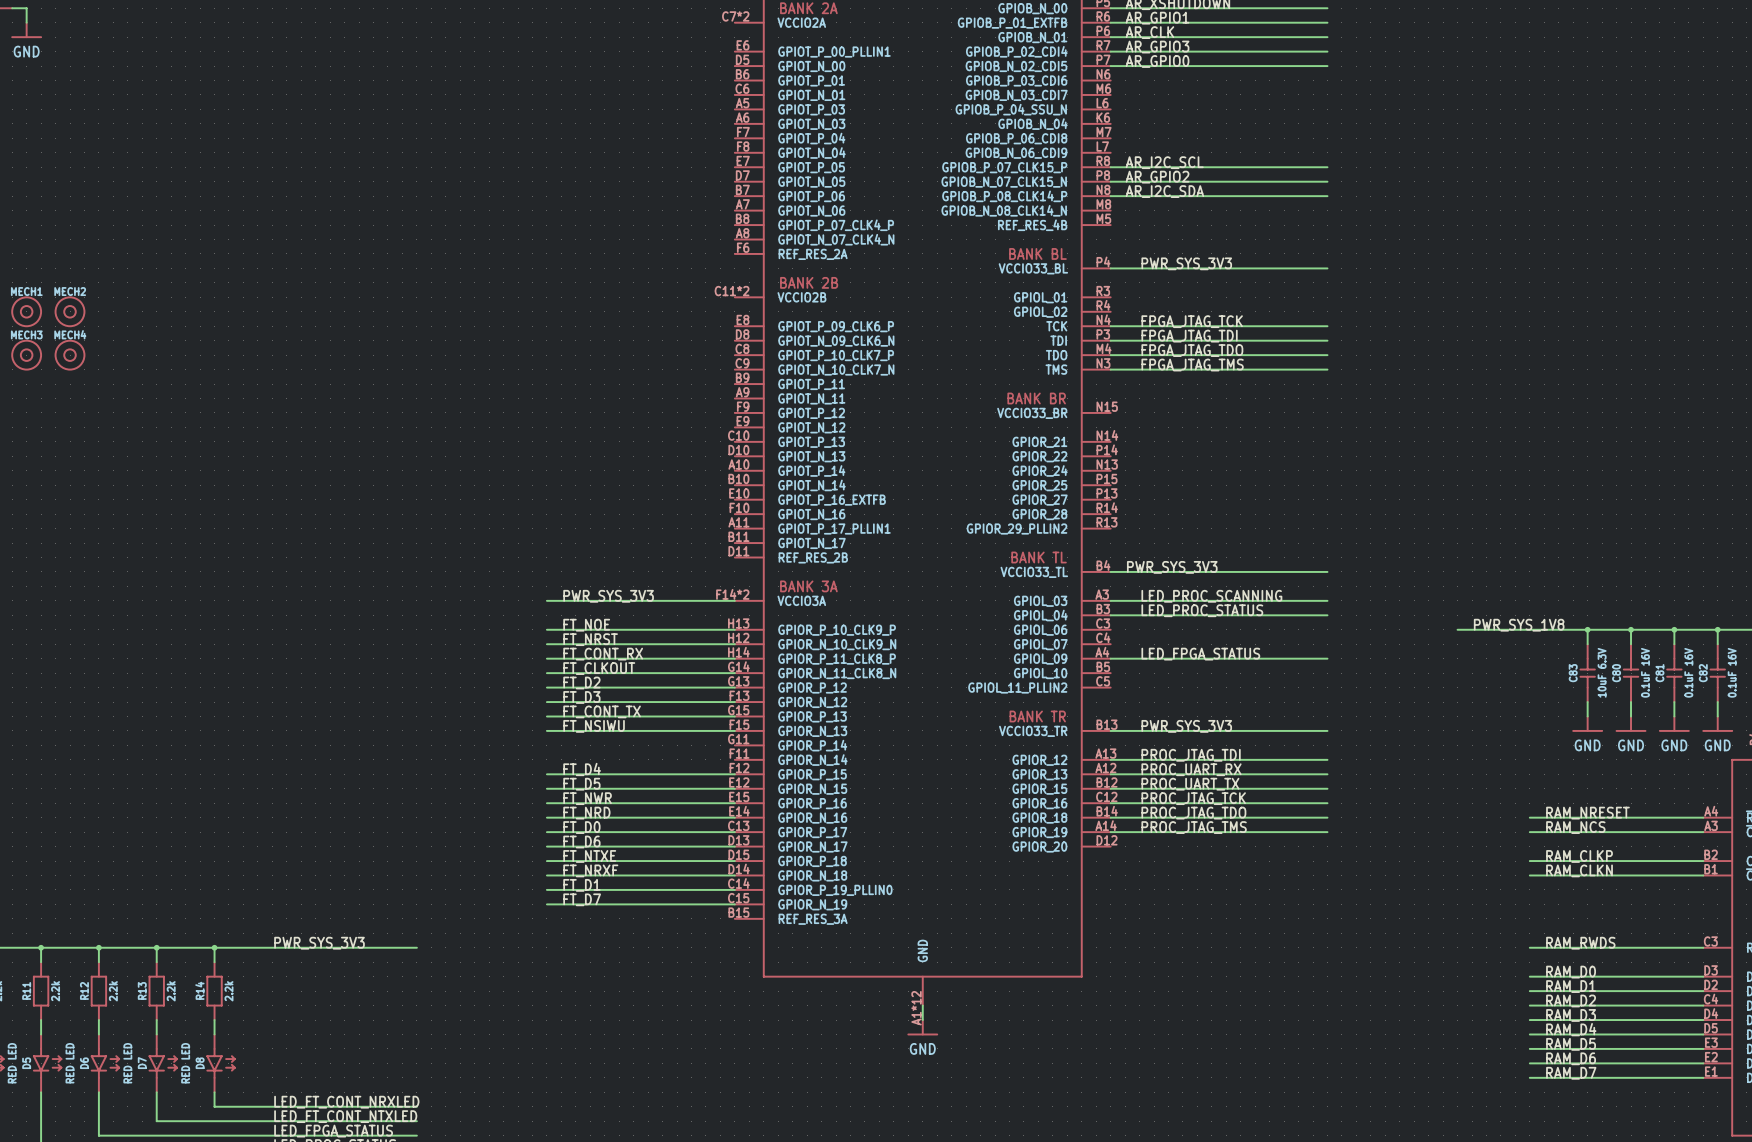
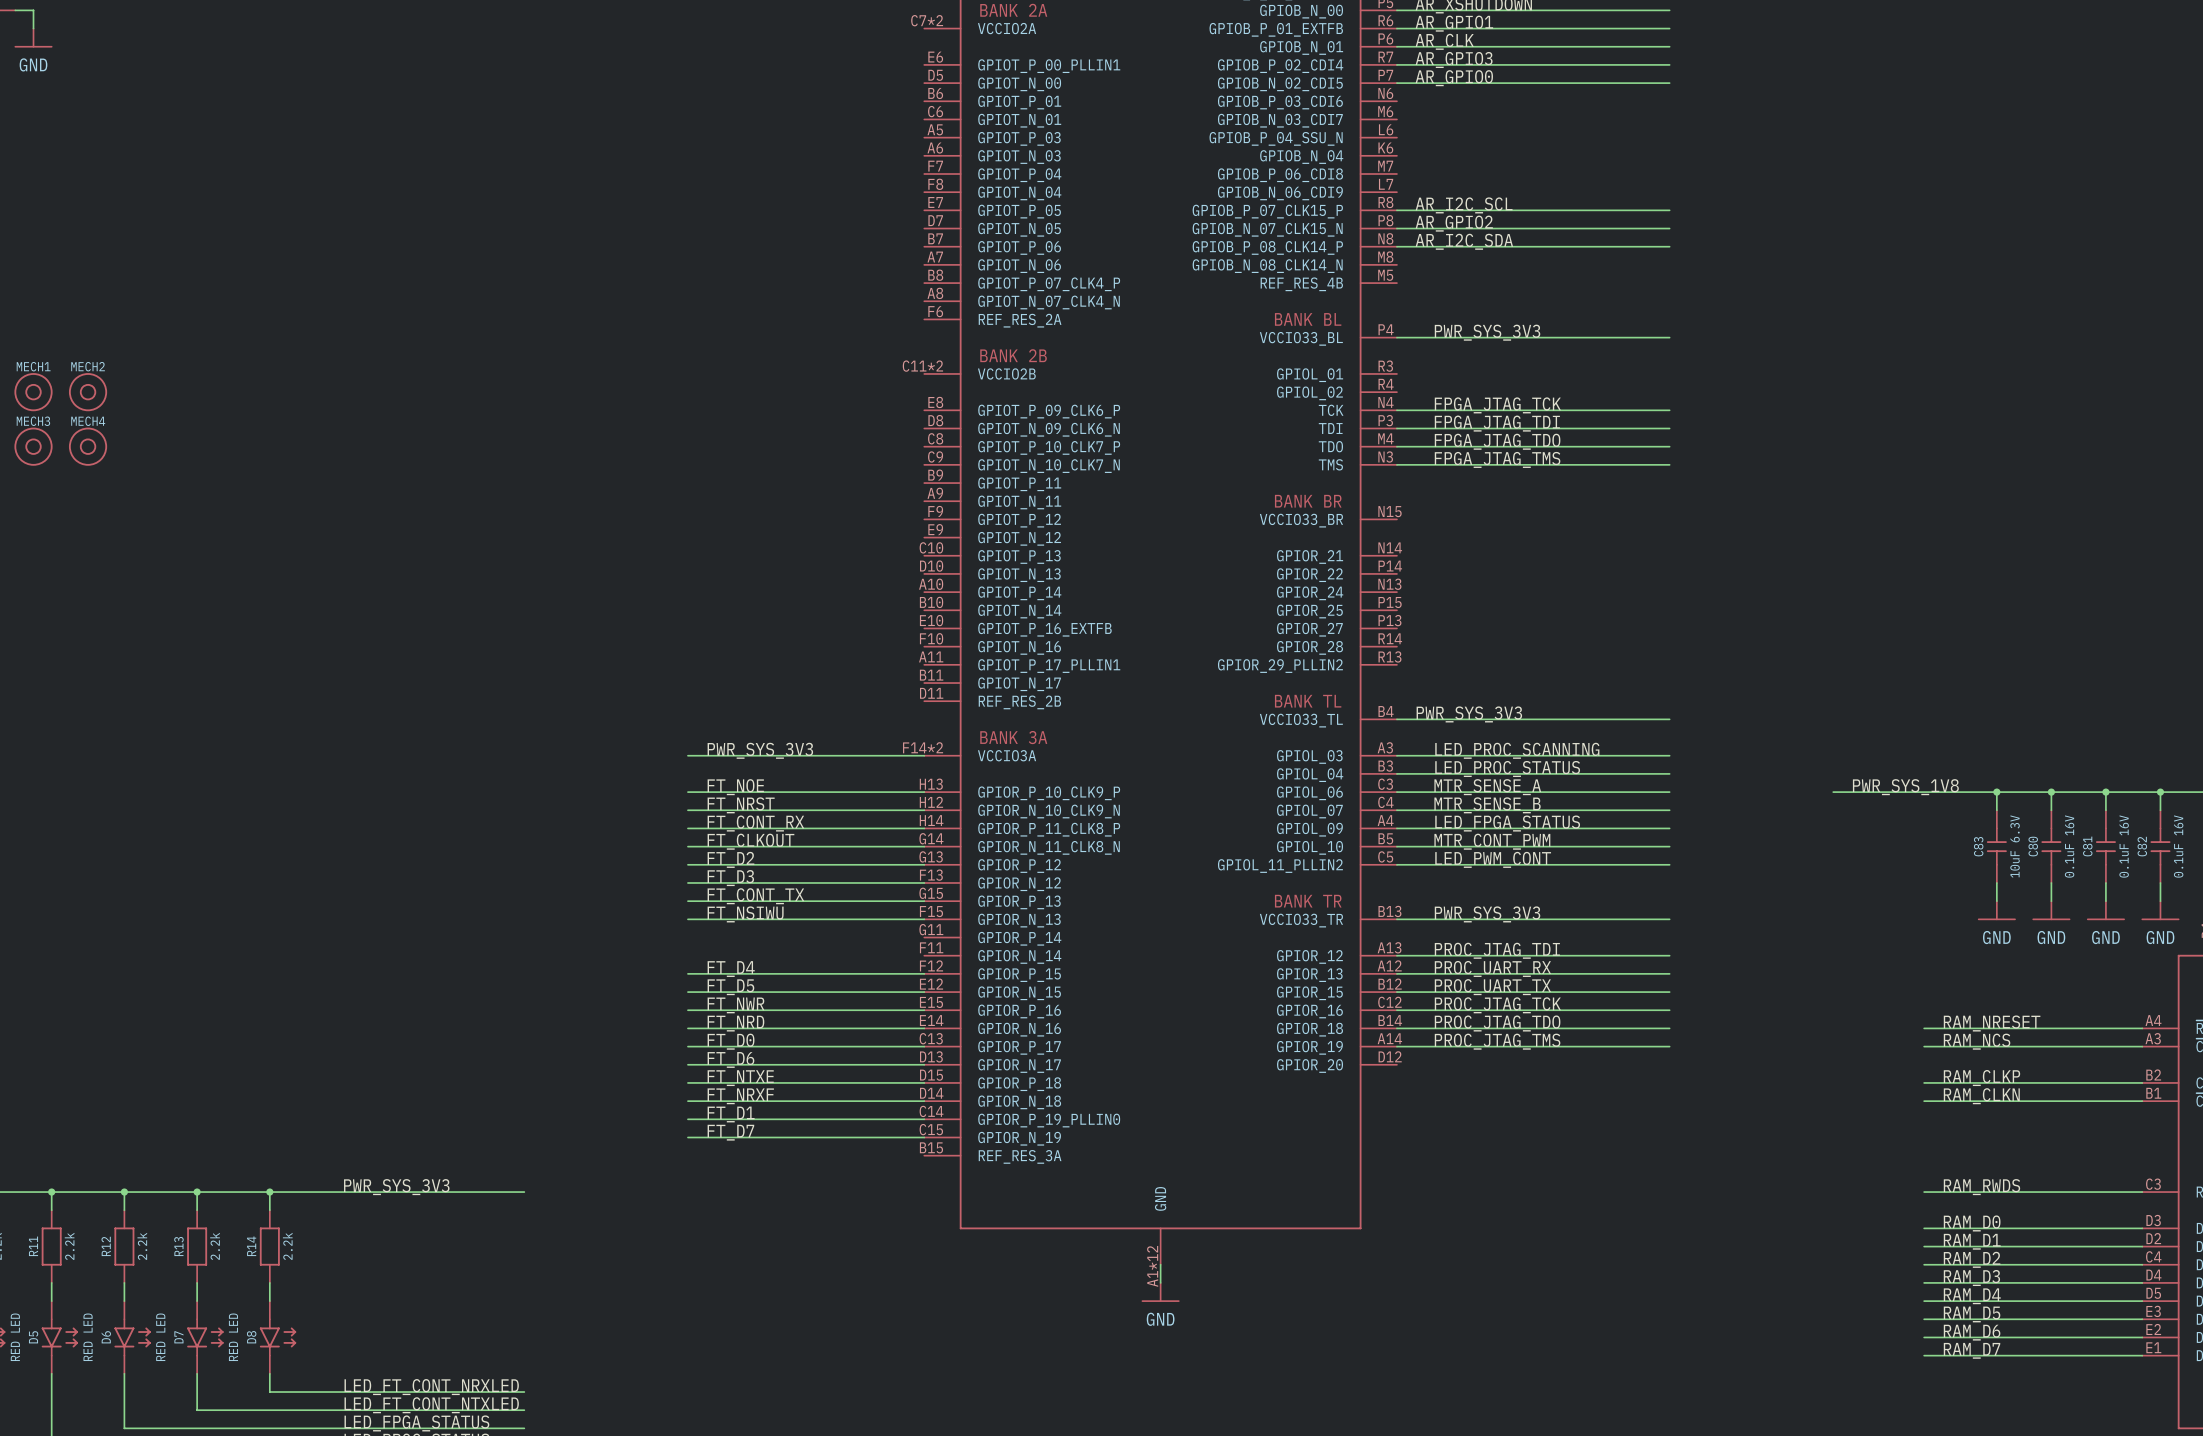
label: none -> MTR_SENSE_A (1487, 787)
wire: none -> (1396, 792) (1669, 792)
label: none -> MTR_SENSE_B (1487, 805)
wire: none -> (1396, 810) (1669, 810)
label: none -> MTR_CONT_PWM (1492, 841)
wire: none -> (1396, 846) (1669, 846)
label: none -> LED_PWM_CONT (1493, 859)
wire: none -> (1396, 864) (1669, 864)

